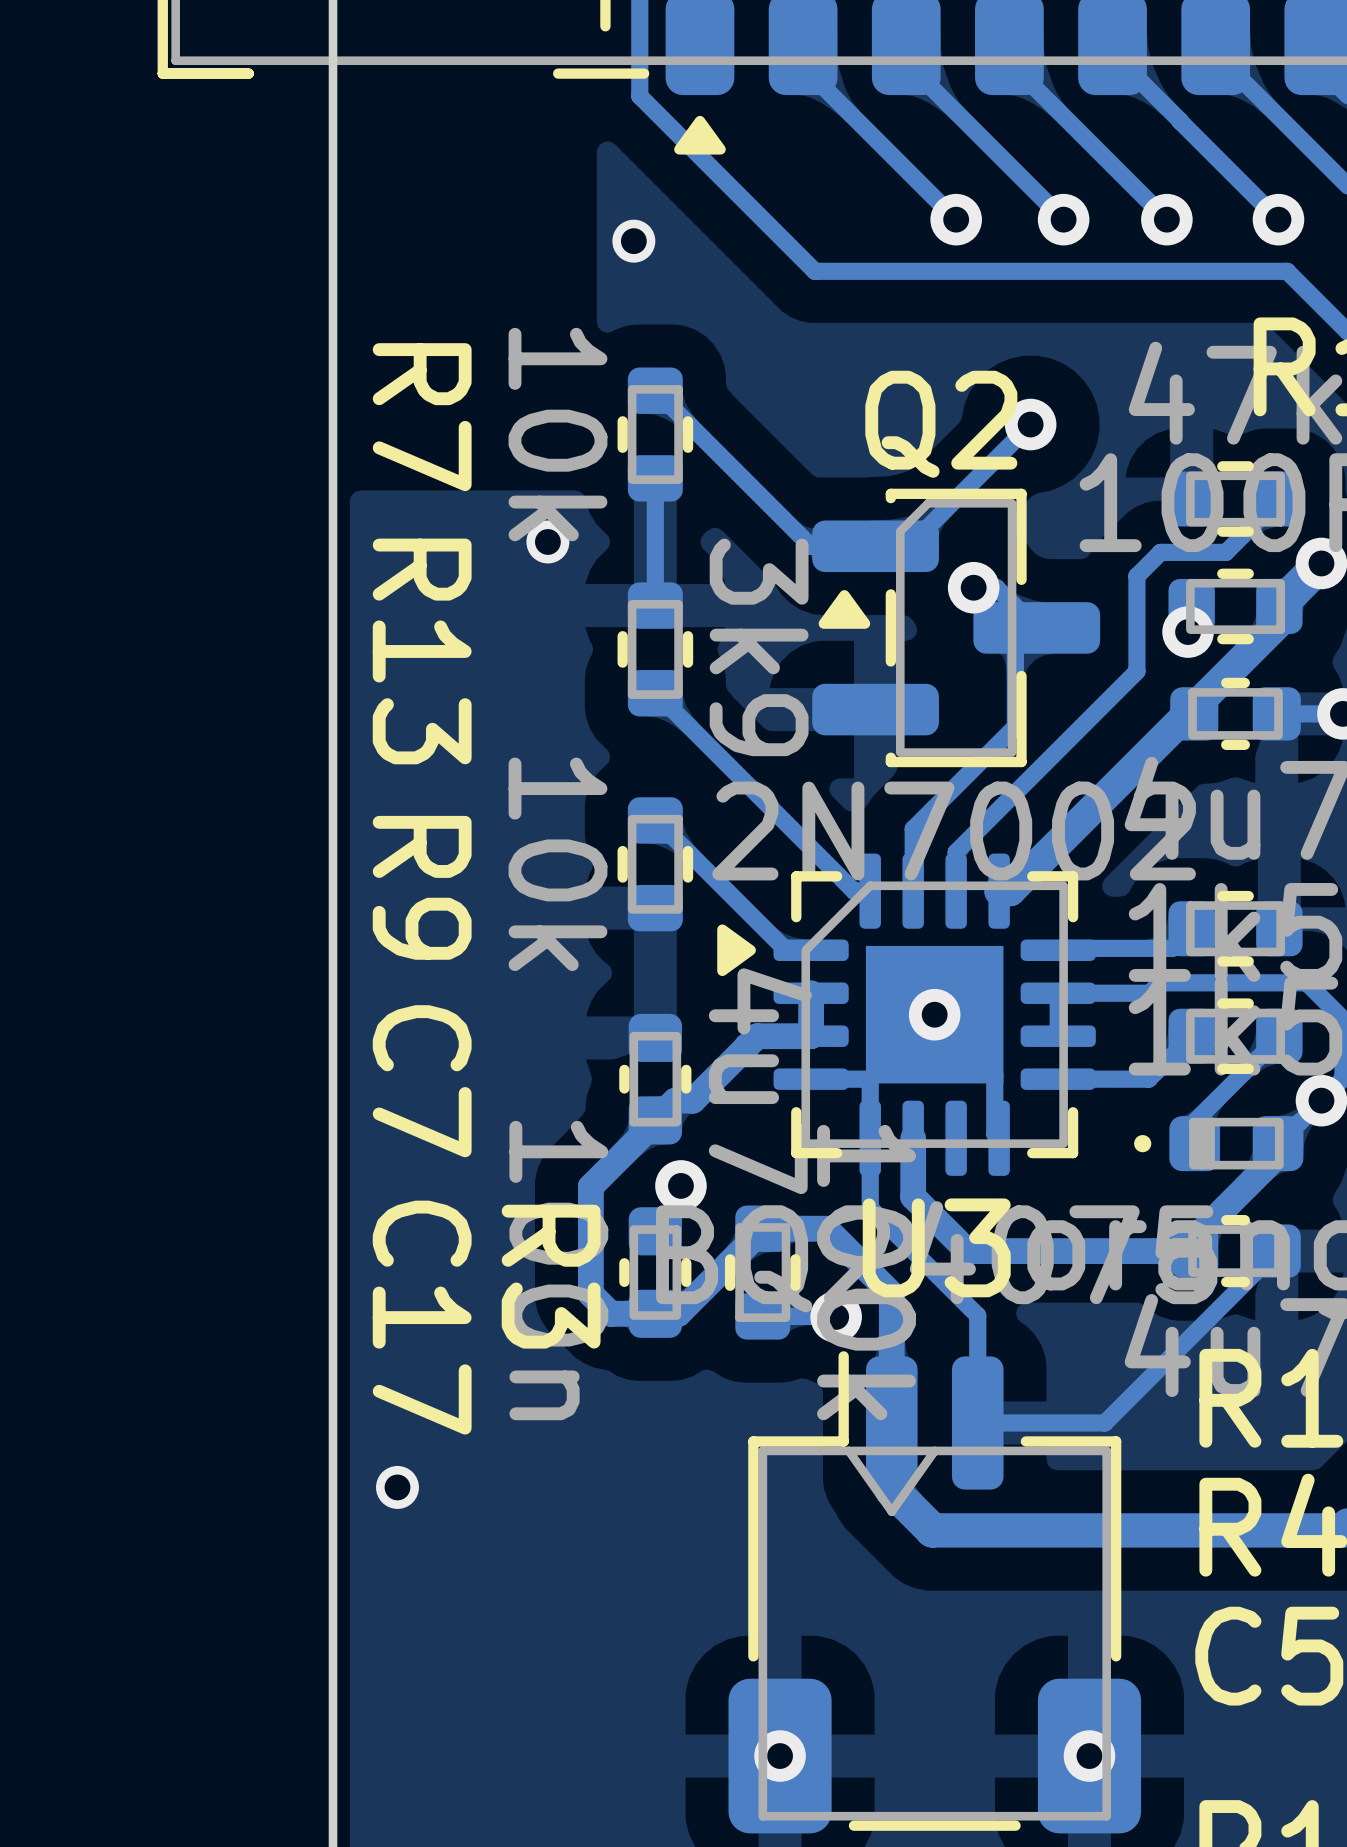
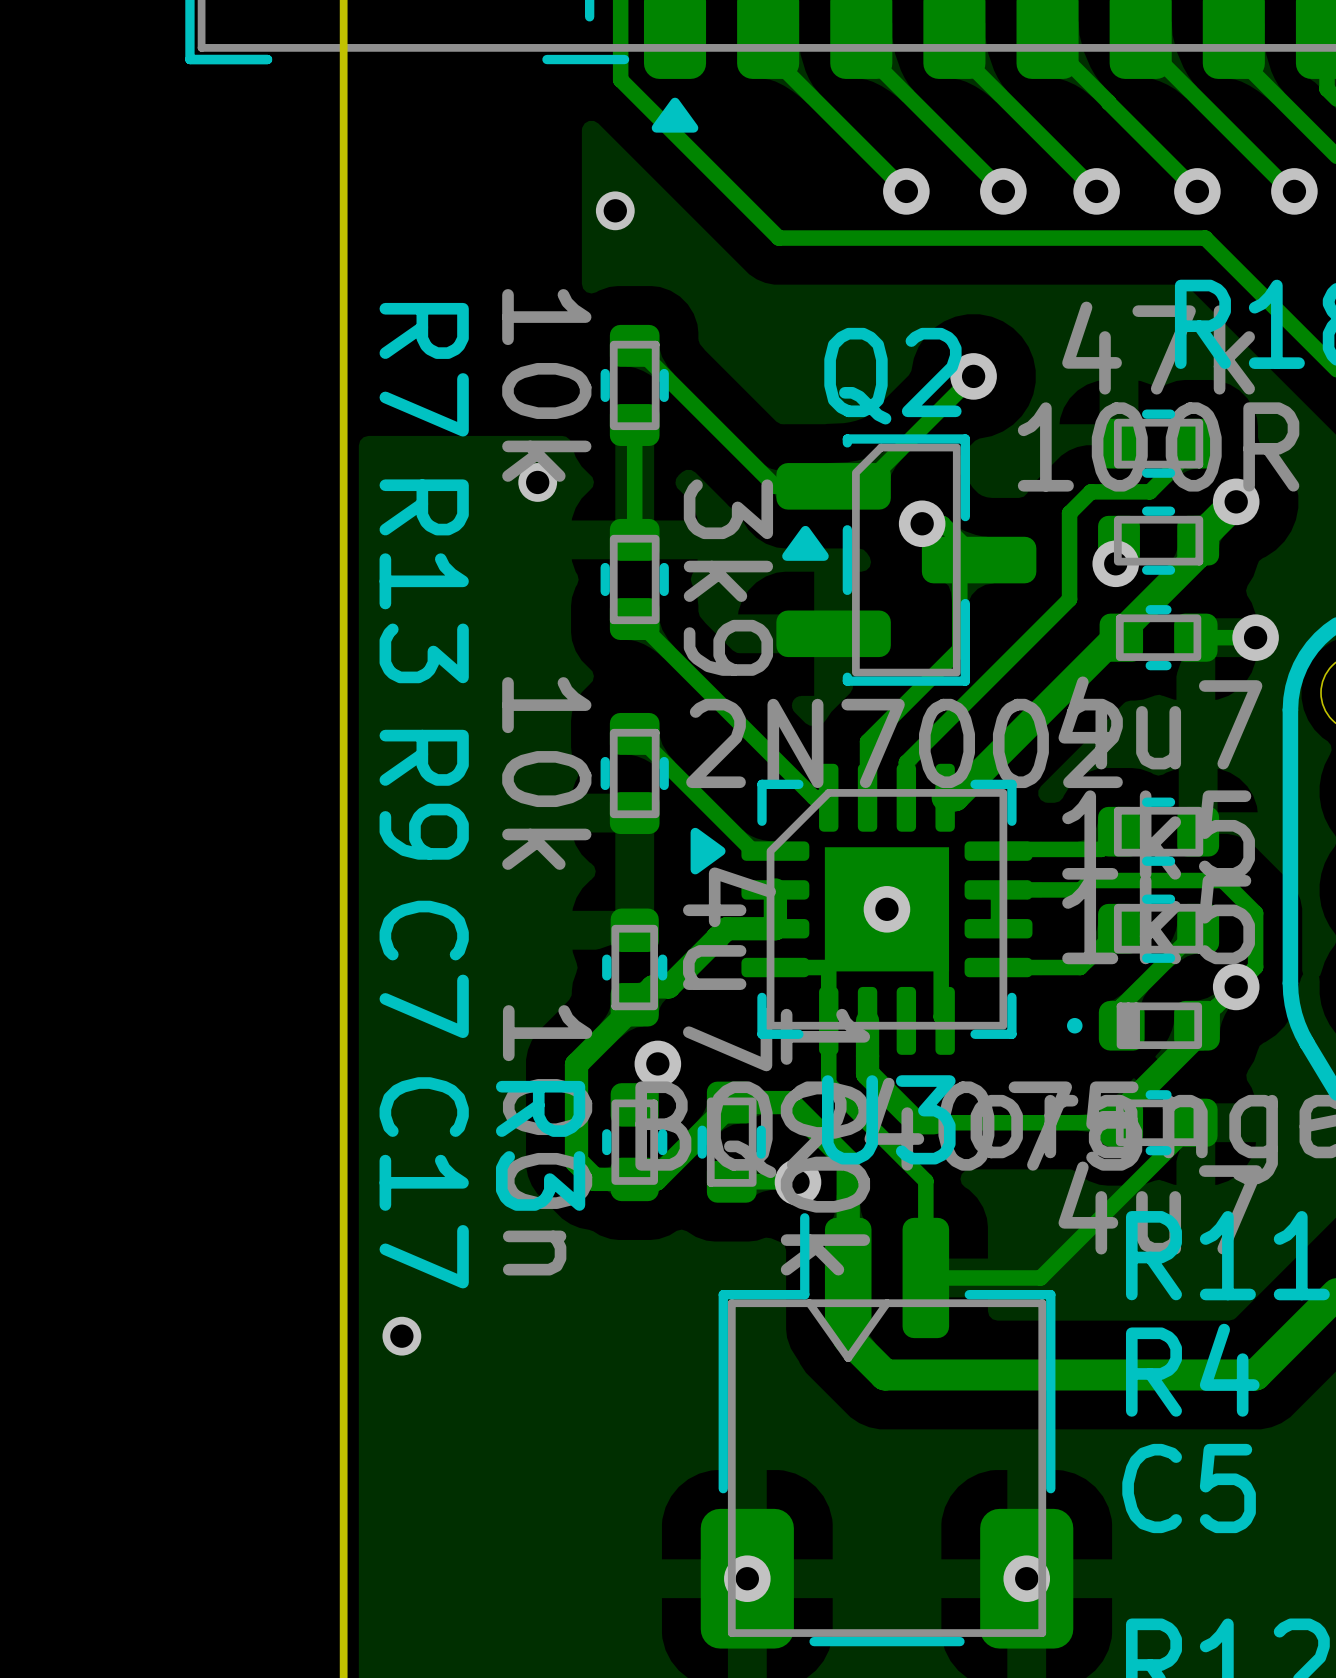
track width: thick (1195, 1251) (987, 1251) -> thin (1122, 1122) (934, 1122)

